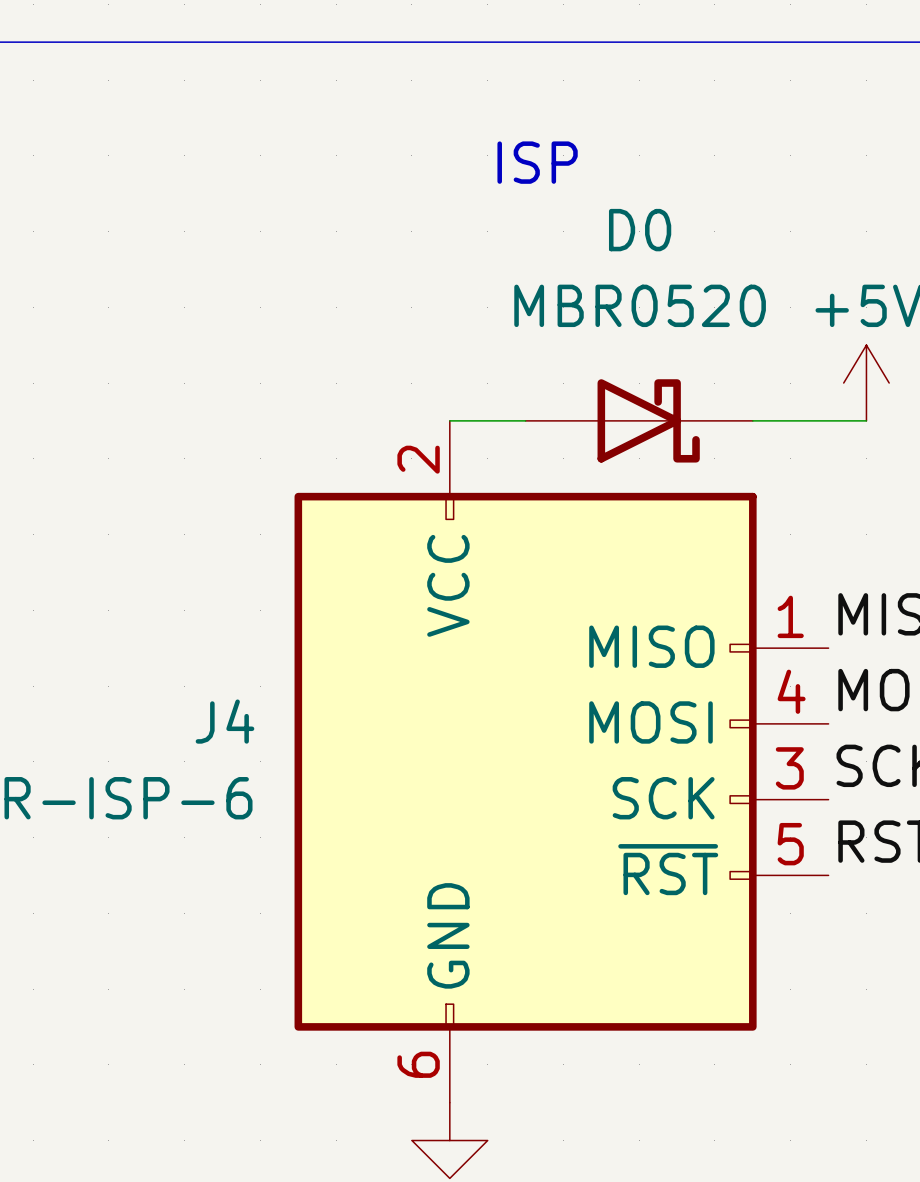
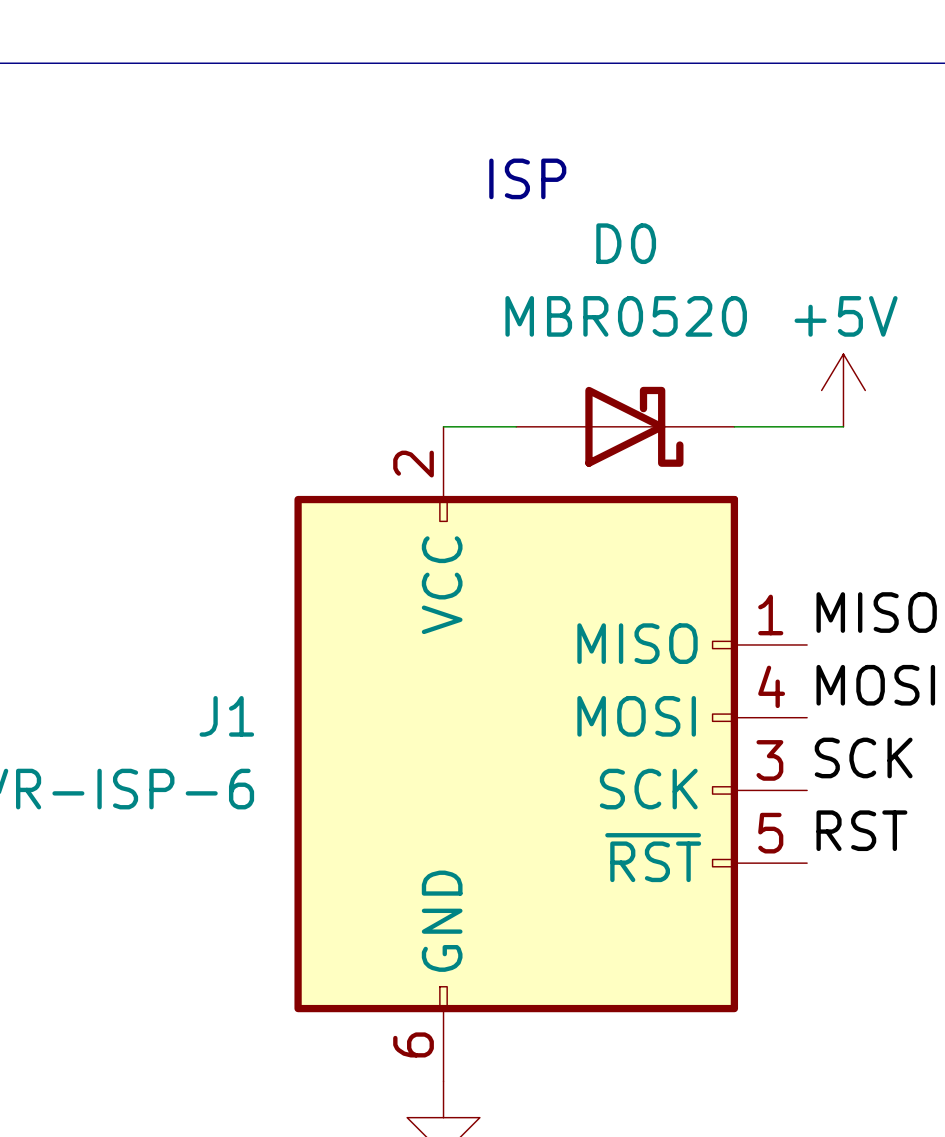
J4 name: J4 (224, 721) -> J1 (226, 716)

